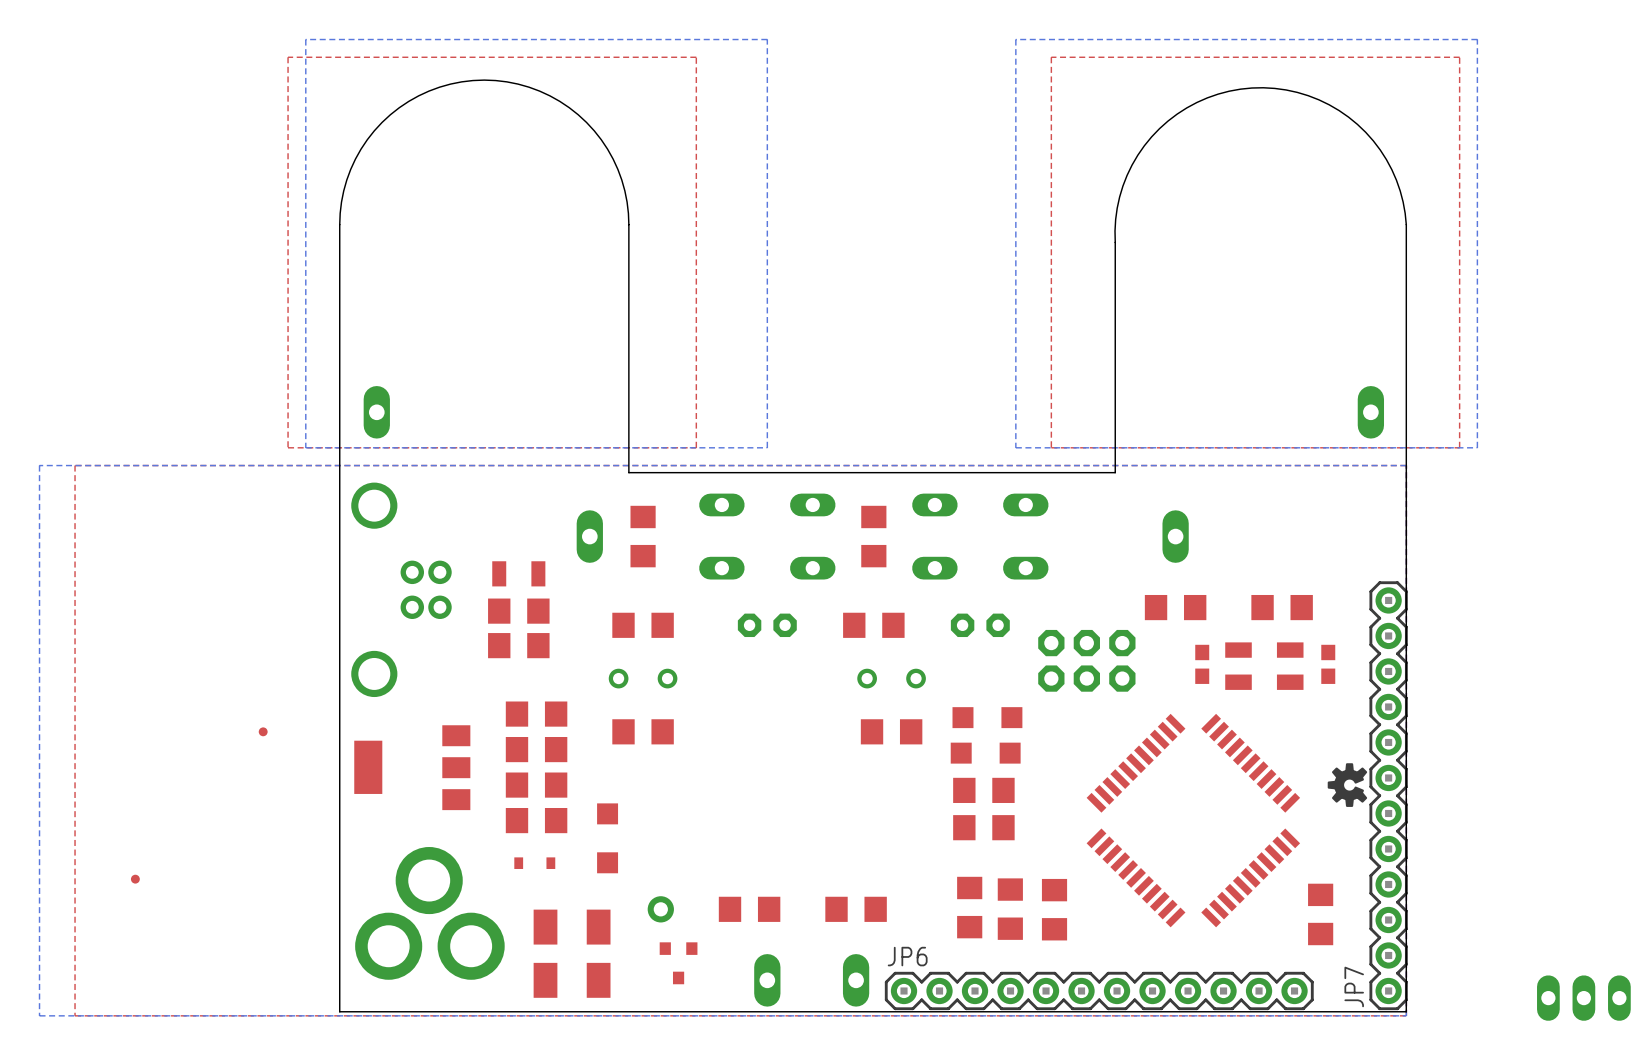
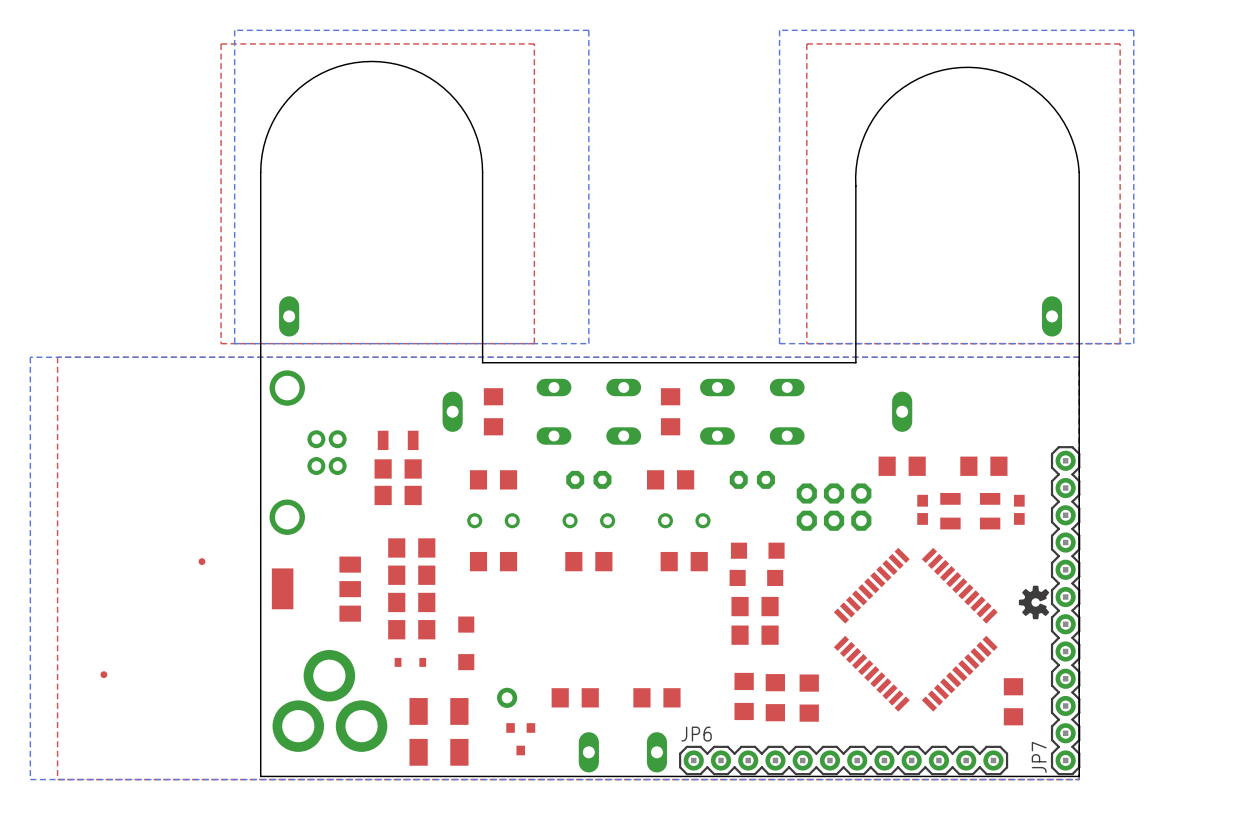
part: none -> (588, 520)
part: none -> (588, 561)
part: (1583, 998) -> none

